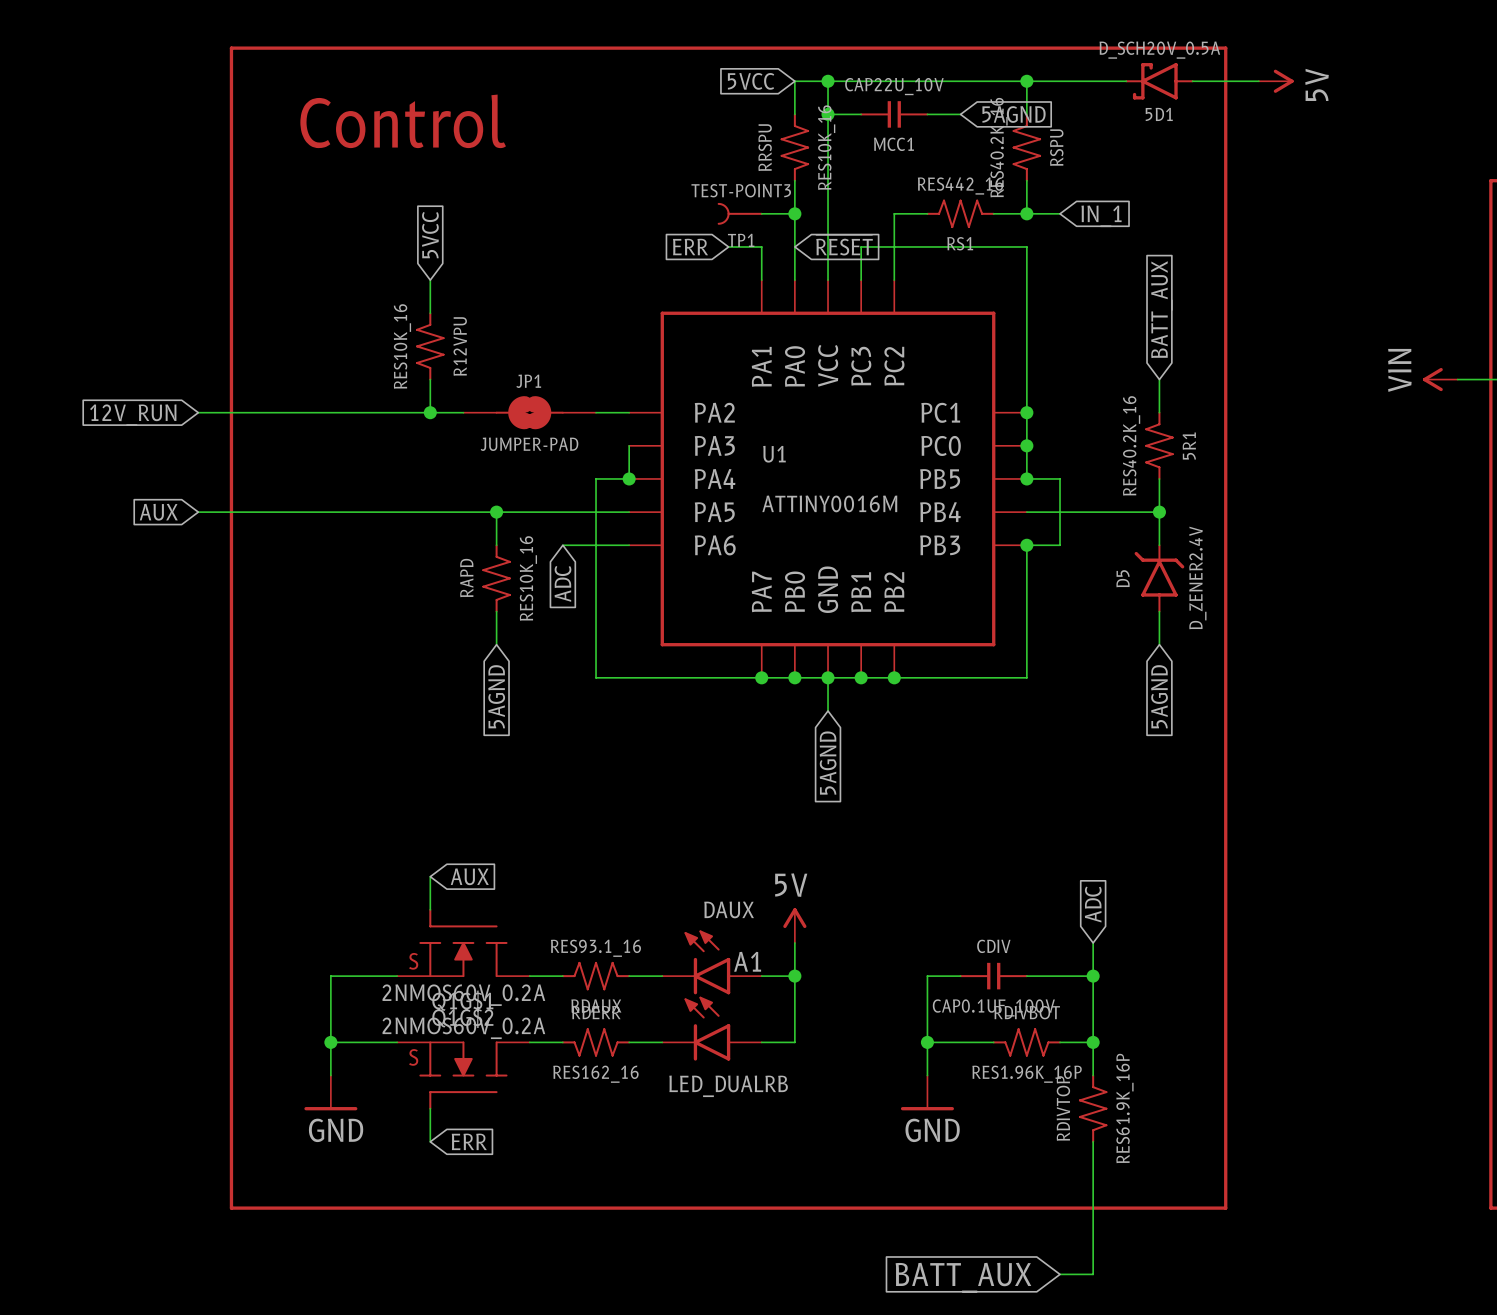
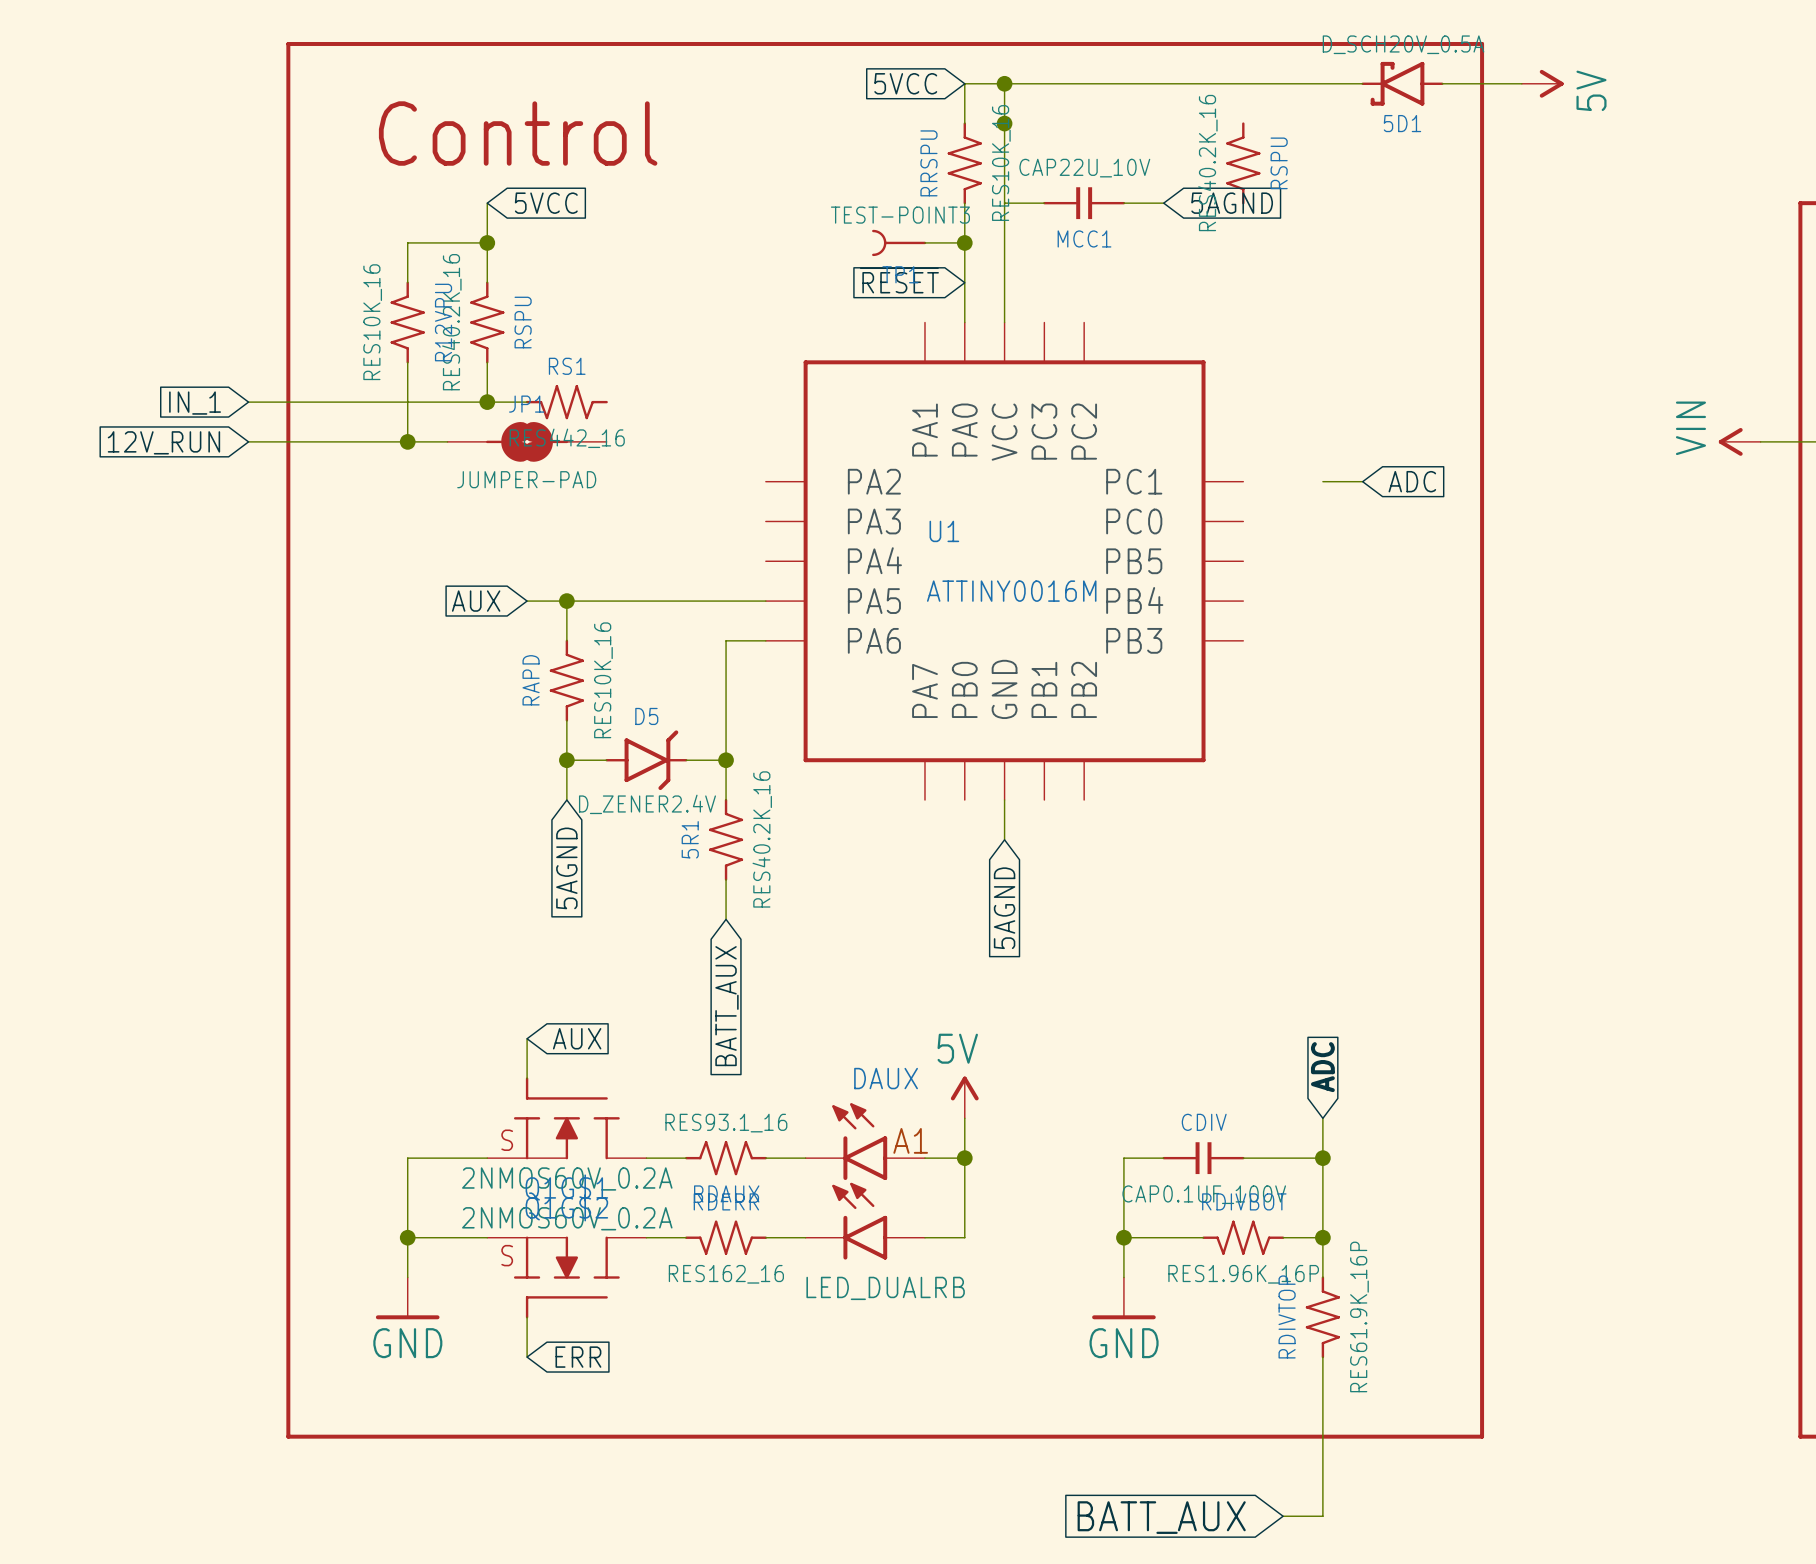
wire: (1026, 81) (1026, 114) -> none
junction: (1026, 81) -> none
wire: (828, 114) (861, 114) -> (1004, 203) (1044, 203)
MCC1 position: (894, 114) -> (1084, 203)
wire: (927, 114) (960, 114) -> (1123, 203) (1163, 203)
global label position: 5AGND (1014, 114) -> 5AGND (1232, 203)
wire: none -> (487, 203) (487, 282)
wire: (1026, 180) (1026, 213) -> none
wire: none -> (487, 242) (407, 242) (407, 282)
junction: none -> (487, 242)
wire: (927, 213) (894, 213) (894, 280) -> none
RS1 rotation: 0° (960, 213) -> 180° (566, 402)
RS1 position: (960, 213) -> (566, 402)
wire: (993, 213) (1060, 213) -> none
junction: (1026, 213) -> none
global label: IN_1 (1101, 216) -> none
global label rotation: 0° (430, 235) -> 90° clockwise (546, 203)
global label rotation: 0° (844, 245) -> 180° (899, 280)
wire: (728, 246) (761, 246) (761, 280) -> none
global label: ERR (690, 247) -> none
RSPU: none -> RES40.2K_16 (487, 322)
wire: (430, 280) (430, 313) -> (487, 362) (487, 402)
wire: (861, 280) (861, 246) (1026, 246) (1026, 478) (1060, 478) (1060, 545) (1026, 545) (1026, 677) (596, 677) -> none
global label: BATT_AUX (1161, 309) -> none
wire: none -> (407, 362) (407, 441)
junction: none -> (487, 402)
R12VPU position: (430, 346) -> (407, 322)
global label: none -> IN_1 (195, 403)
wire: none -> (248, 441) (447, 441)
junction: none -> (407, 441)
wire: (430, 379) (430, 412) -> none
wire: (1159, 379) (1159, 412) -> none
wire: (198, 412) (463, 412) -> none
junction: (430, 412) -> none
JP1 position: (529, 412) -> (527, 441)
wire: (596, 412) (629, 412) -> (686, 760) (726, 760)
junction: (1026, 412) -> none
wire: none -> (1322, 481) (1362, 481)
global label: none -> ADC (1412, 481)
global label position: 12V_RUN (133, 415) -> 12V_RUN (163, 442)
wire: (629, 445) (629, 478) (596, 478) (596, 545) (562, 545) -> none
junction: (1026, 445) -> none
5R1 rotation: 0° (1159, 445) -> 180° (726, 839)
5R1 position: (1159, 445) -> (726, 839)
junction: (629, 478) -> none
junction: (1026, 478) -> none
wire: (1159, 478) (1159, 545) -> none
global label position: AUX (158, 512) -> AUX (476, 601)
wire: (198, 512) (430, 512) -> (248, 402) (527, 402)
wire: (496, 512) (496, 545) -> (566, 601) (566, 640)
junction position: (496, 512) -> (566, 601)
wire: (1026, 512) (1159, 512) -> none
junction: (1159, 512) -> none
junction: (1026, 545) -> none
RAPD position: (496, 578) -> (566, 680)
D5 rotation: 0° (1159, 578) -> 90° clockwise (646, 760)
D5 position: (1159, 578) -> (646, 760)
global label: ADC (562, 583) -> none
wire: none -> (566, 720) (566, 800)
wire: (496, 611) (496, 644) -> (566, 760) (606, 760)
wire: (1159, 611) (1159, 644) -> none
junction: none -> (566, 760)
junction: none -> (726, 760)
junction: (761, 677) -> none
junction: (794, 677) -> none
junction: (828, 677) -> none
junction: (861, 677) -> none
junction: (894, 677) -> none
global label position: 5AGND (496, 696) -> 5AGND (566, 868)
global label: 5AGND (1159, 696) -> none
wire: none -> (726, 879) (726, 919)
global label: none -> BATT_AUX (726, 1006)

